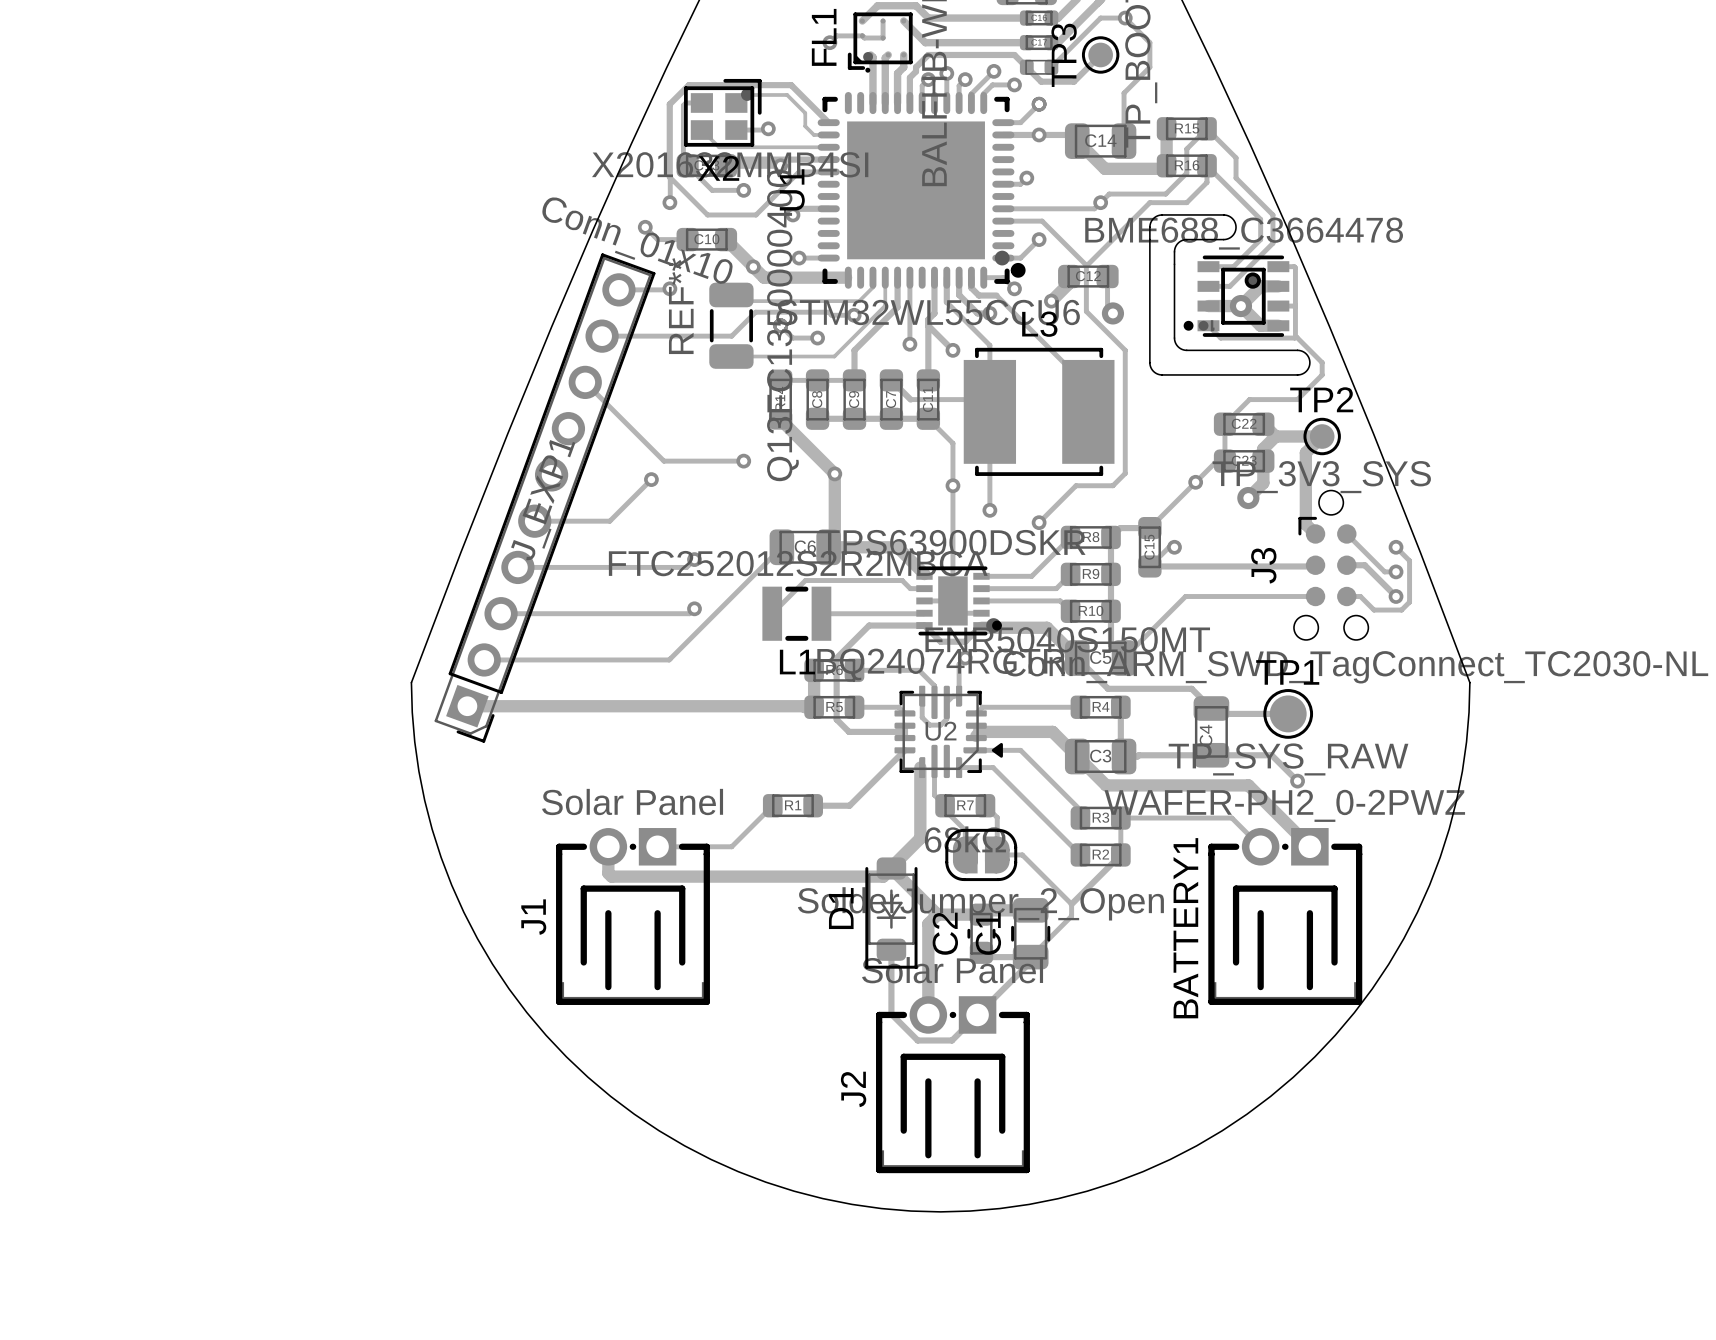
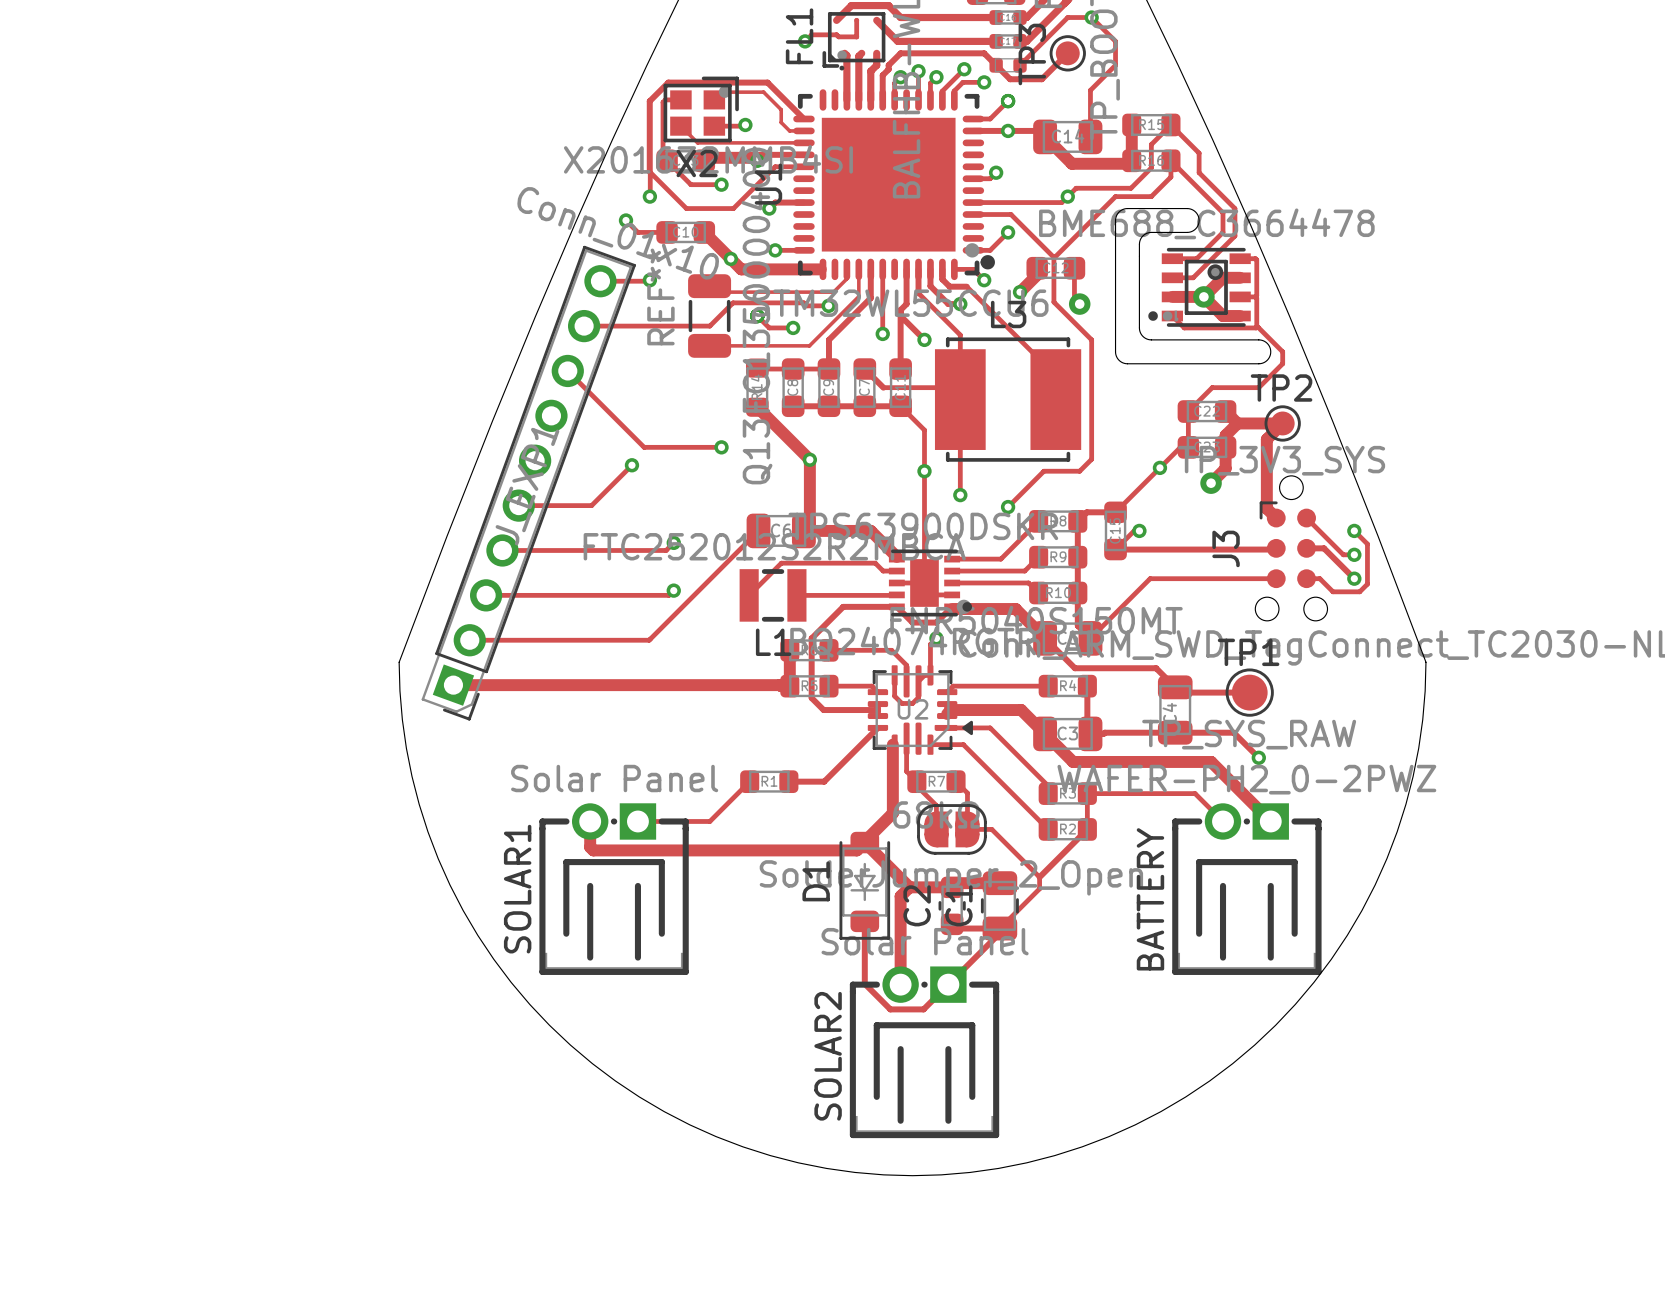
J1 name: J1 (533, 917) -> SOLAR1 (517, 889)
BATTERY1 name: BATTERY1 (1185, 928) -> BATTERY (1150, 899)
J2 name: J2 (853, 1089) -> SOLAR2 (828, 1056)

